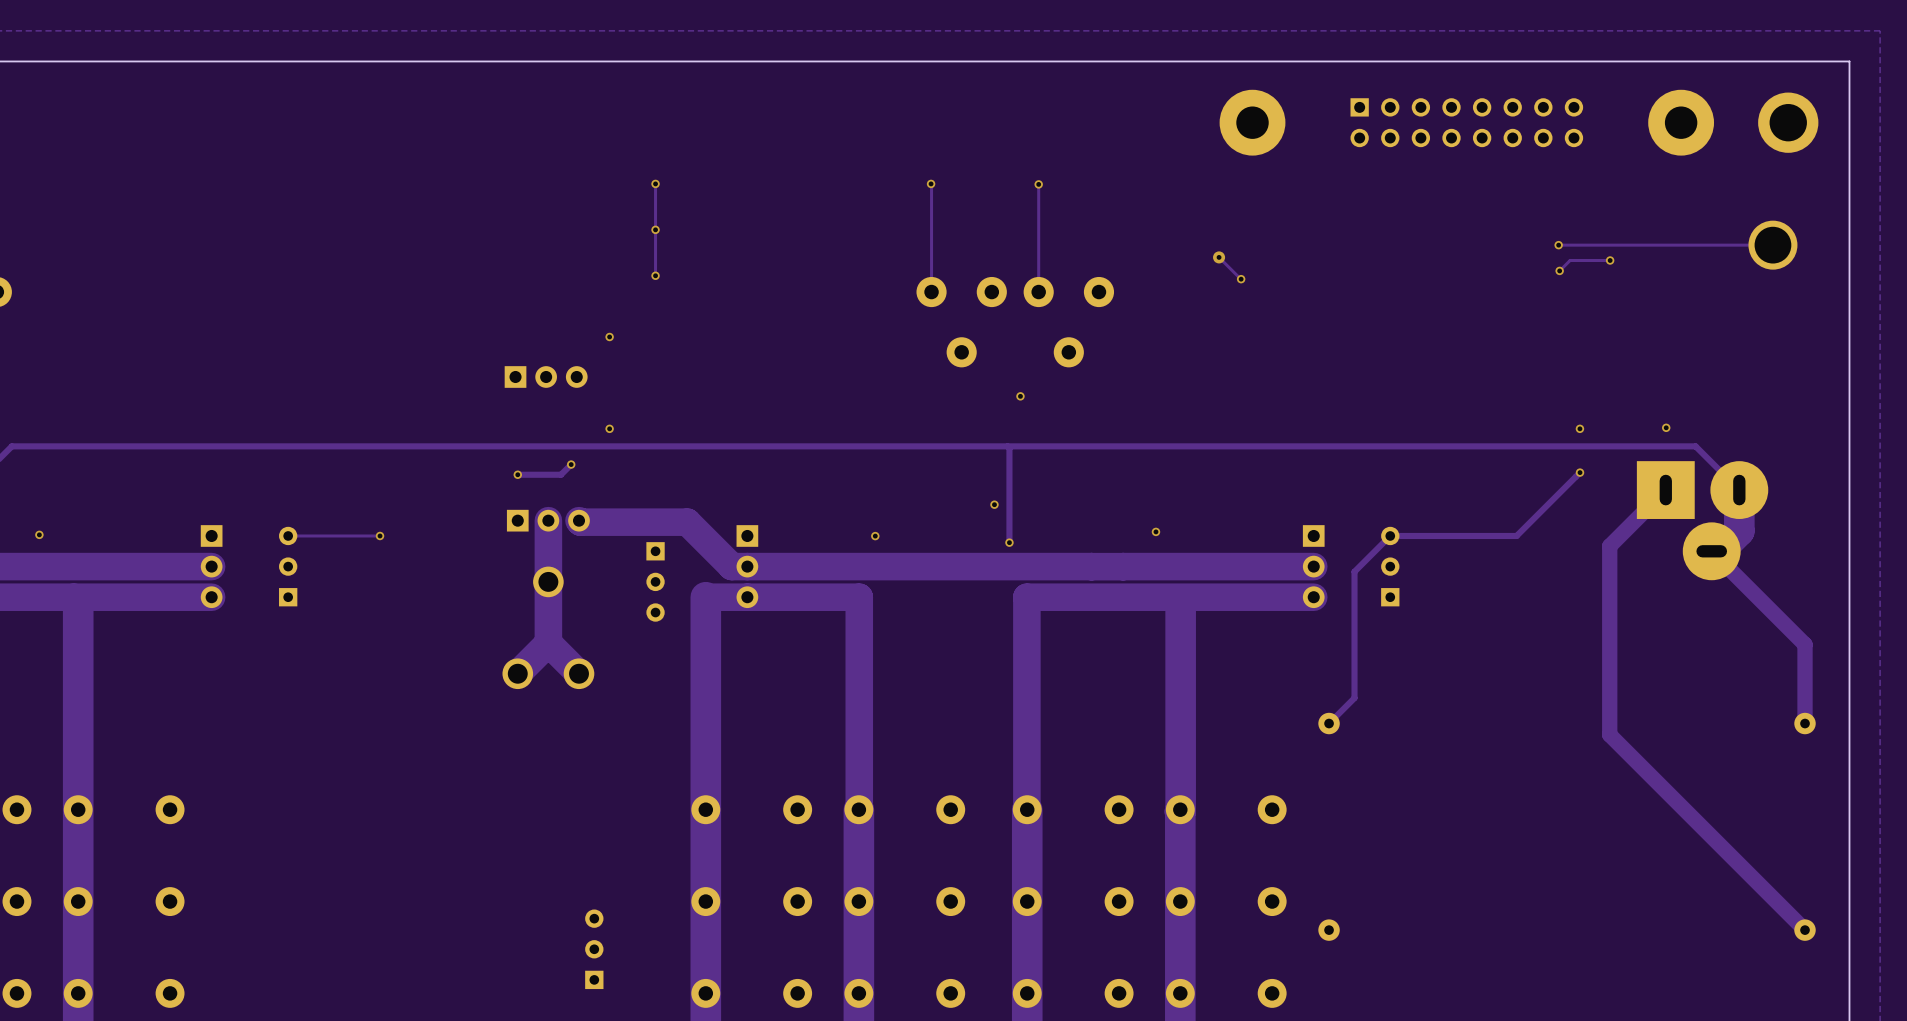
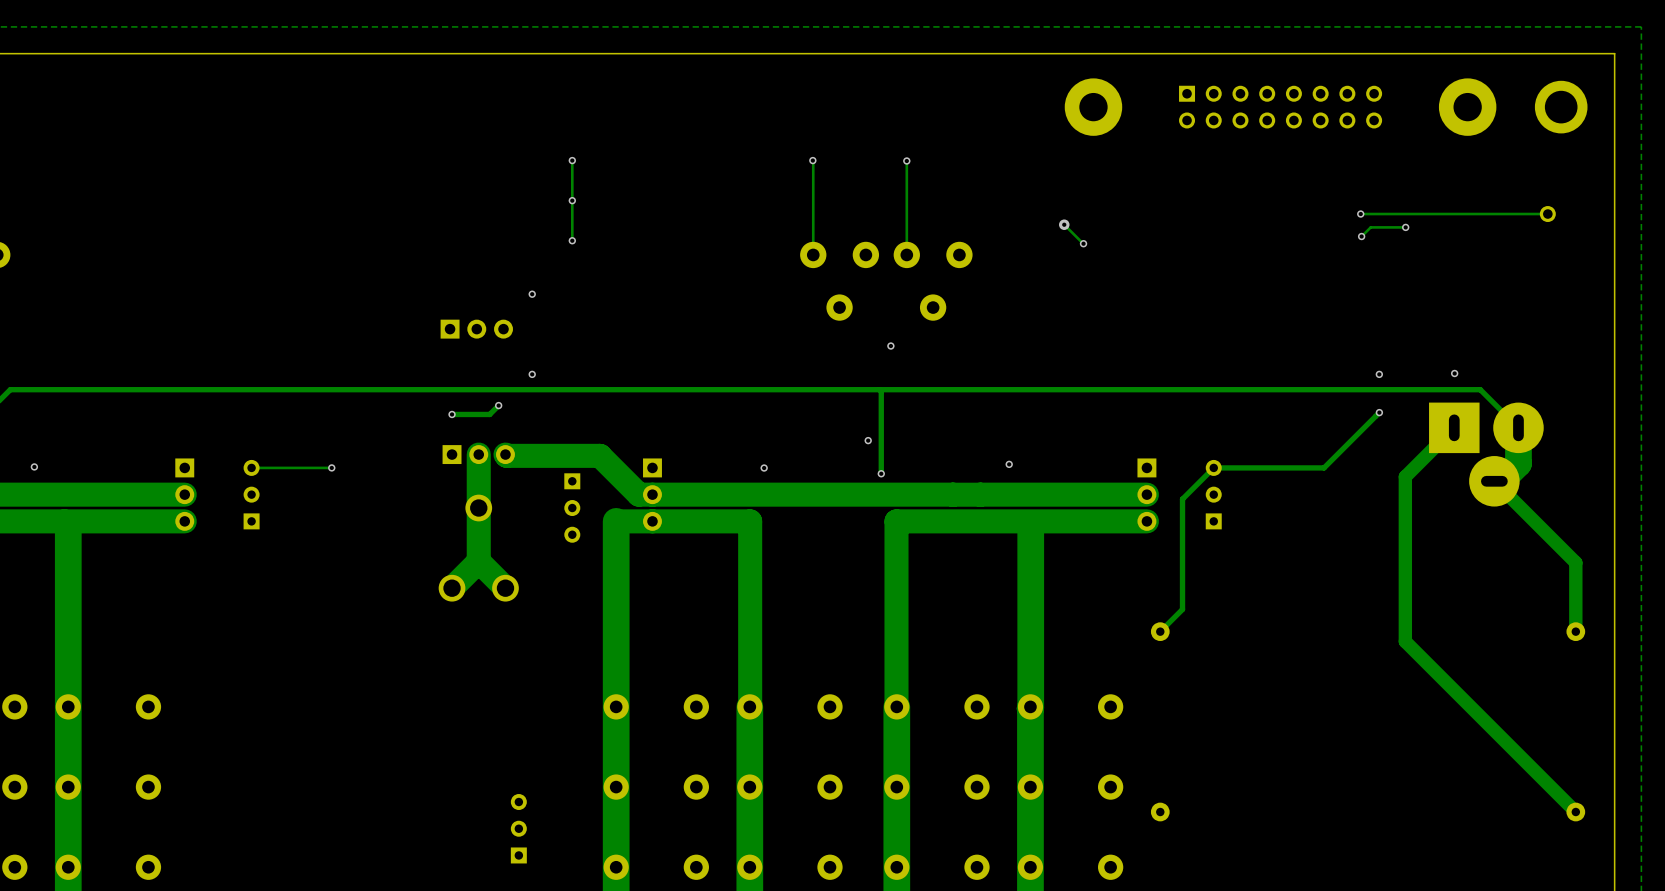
part footprint: [1748, 220, 1798, 270] -> [1539, 206, 1556, 223]

